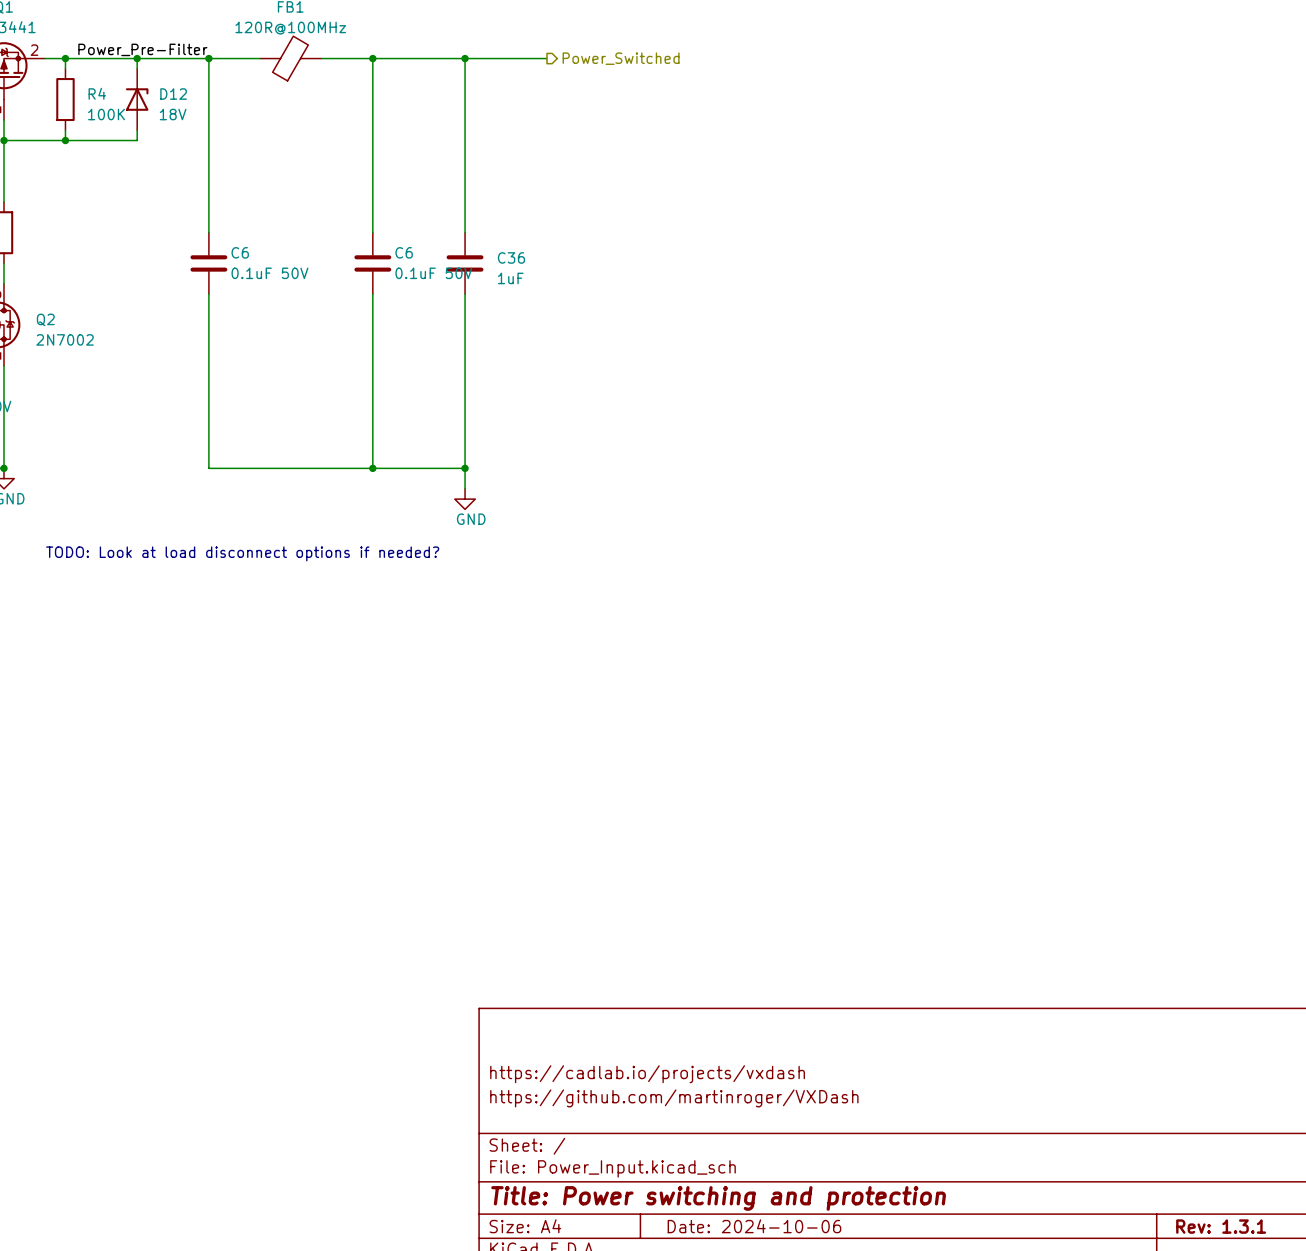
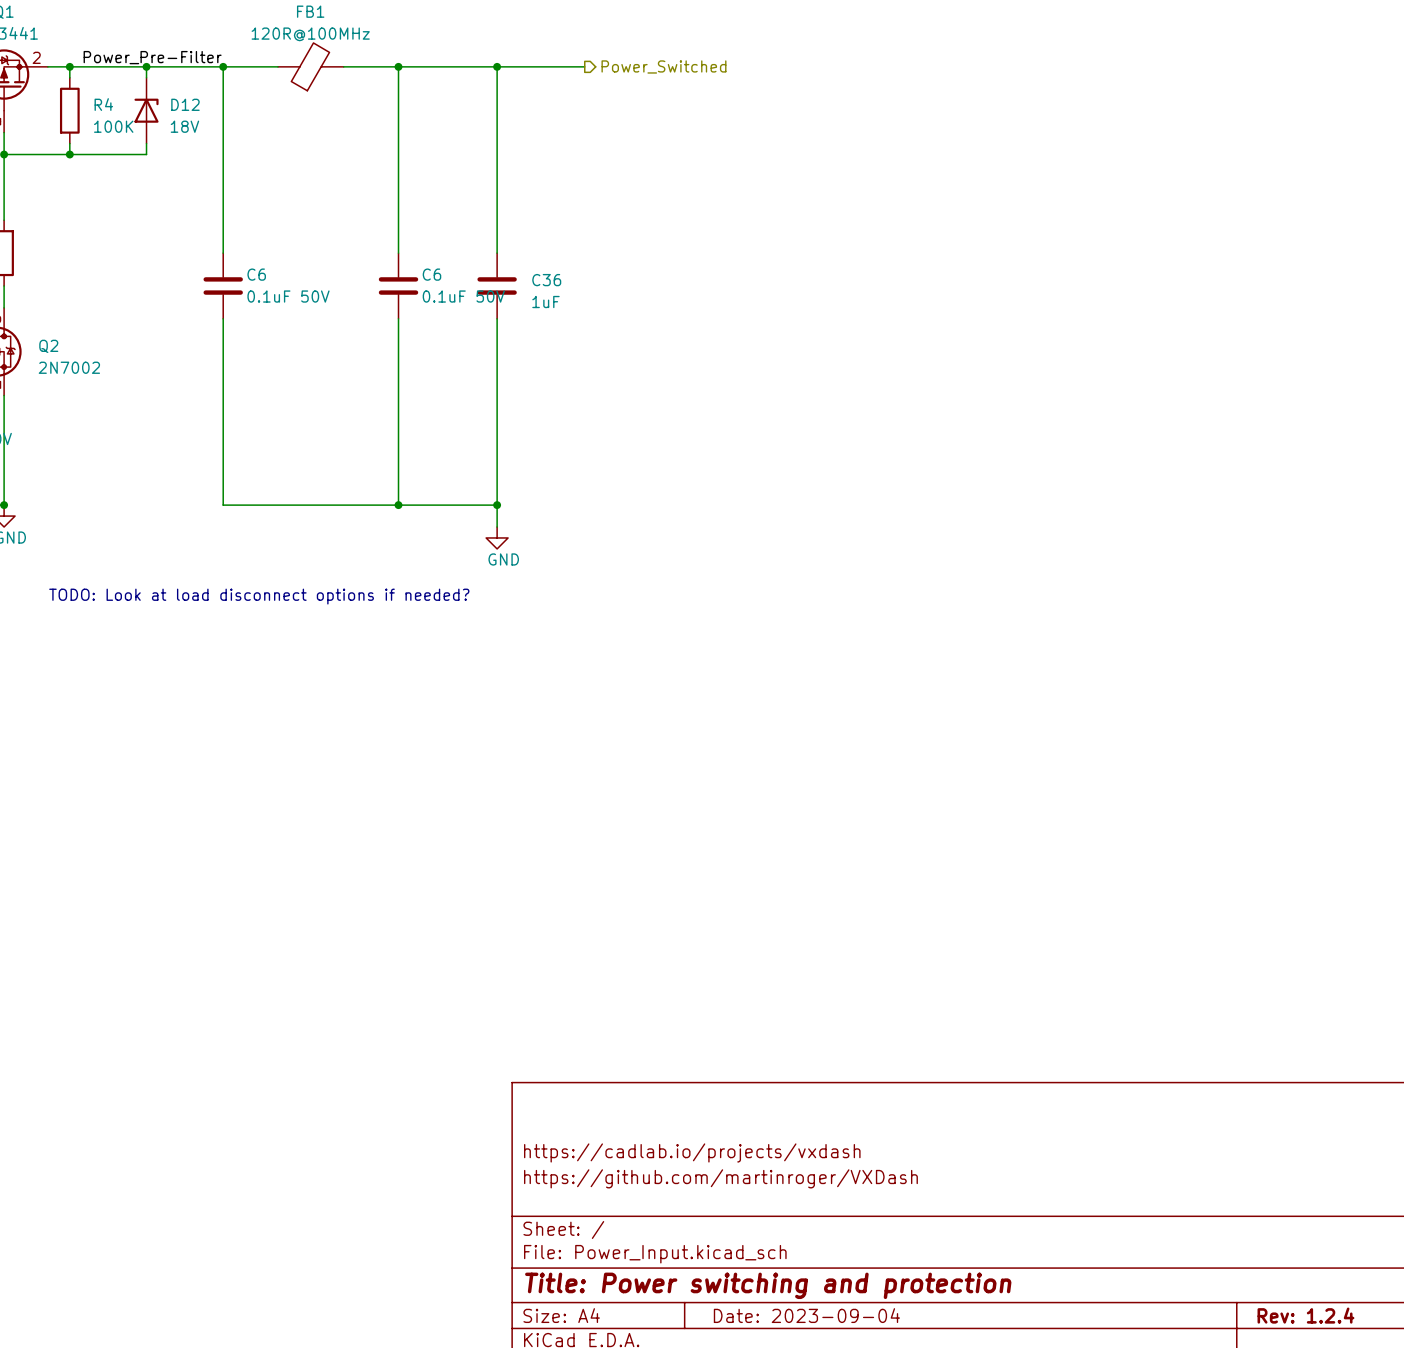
title block: Date: 2024-10-06 (754, 1226) -> Date: 2023-09-04 (806, 1315)
title block: Rev: 1.3.1 (1221, 1226) -> Rev: 1.2.4 (1305, 1315)

